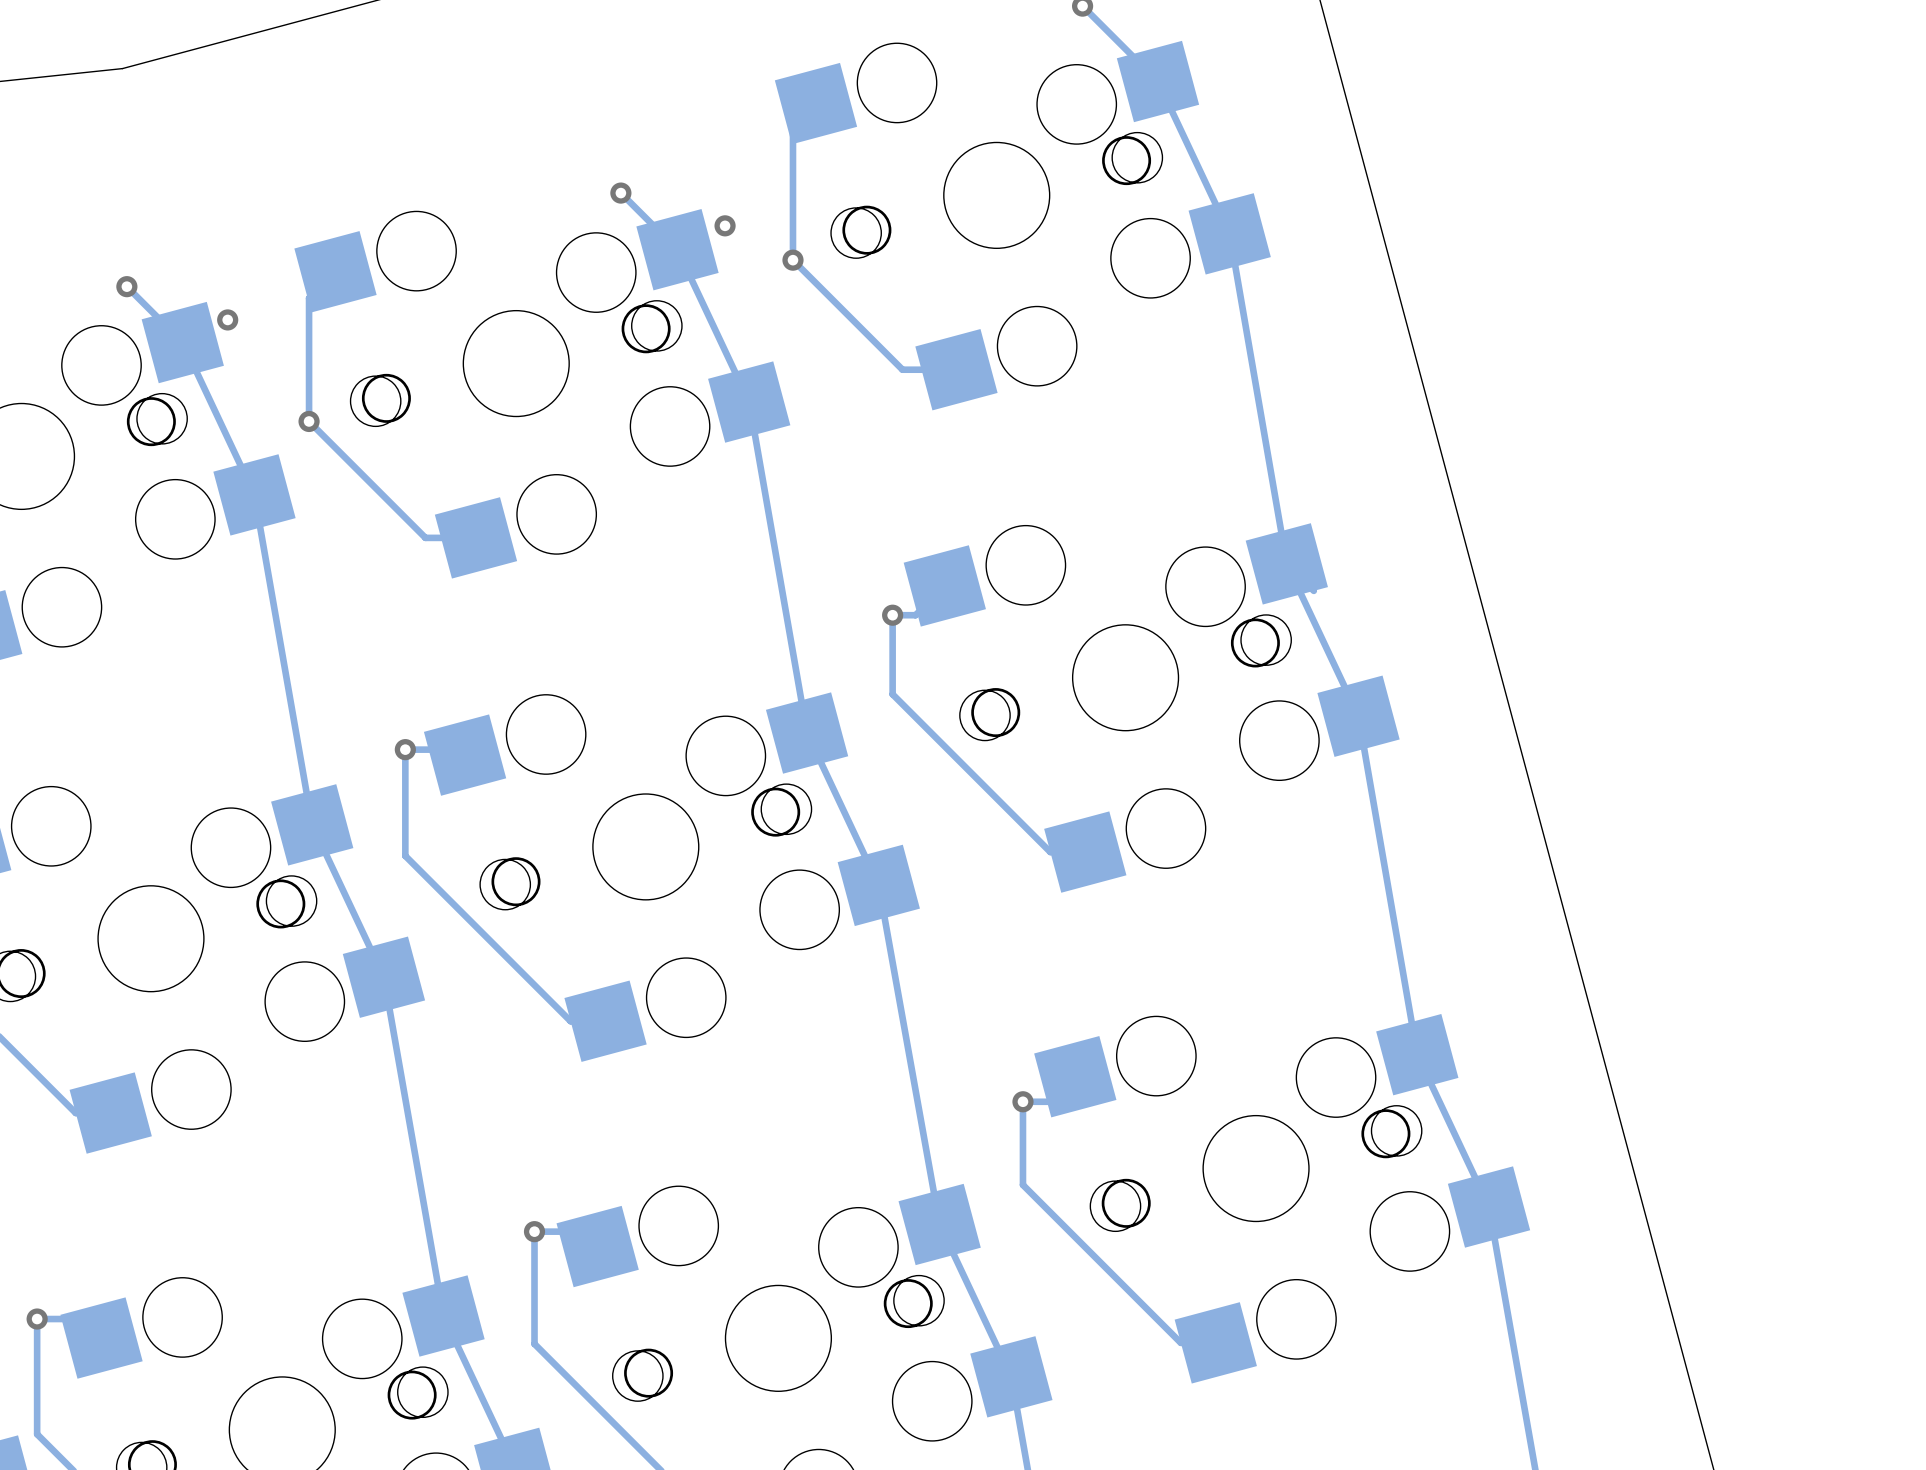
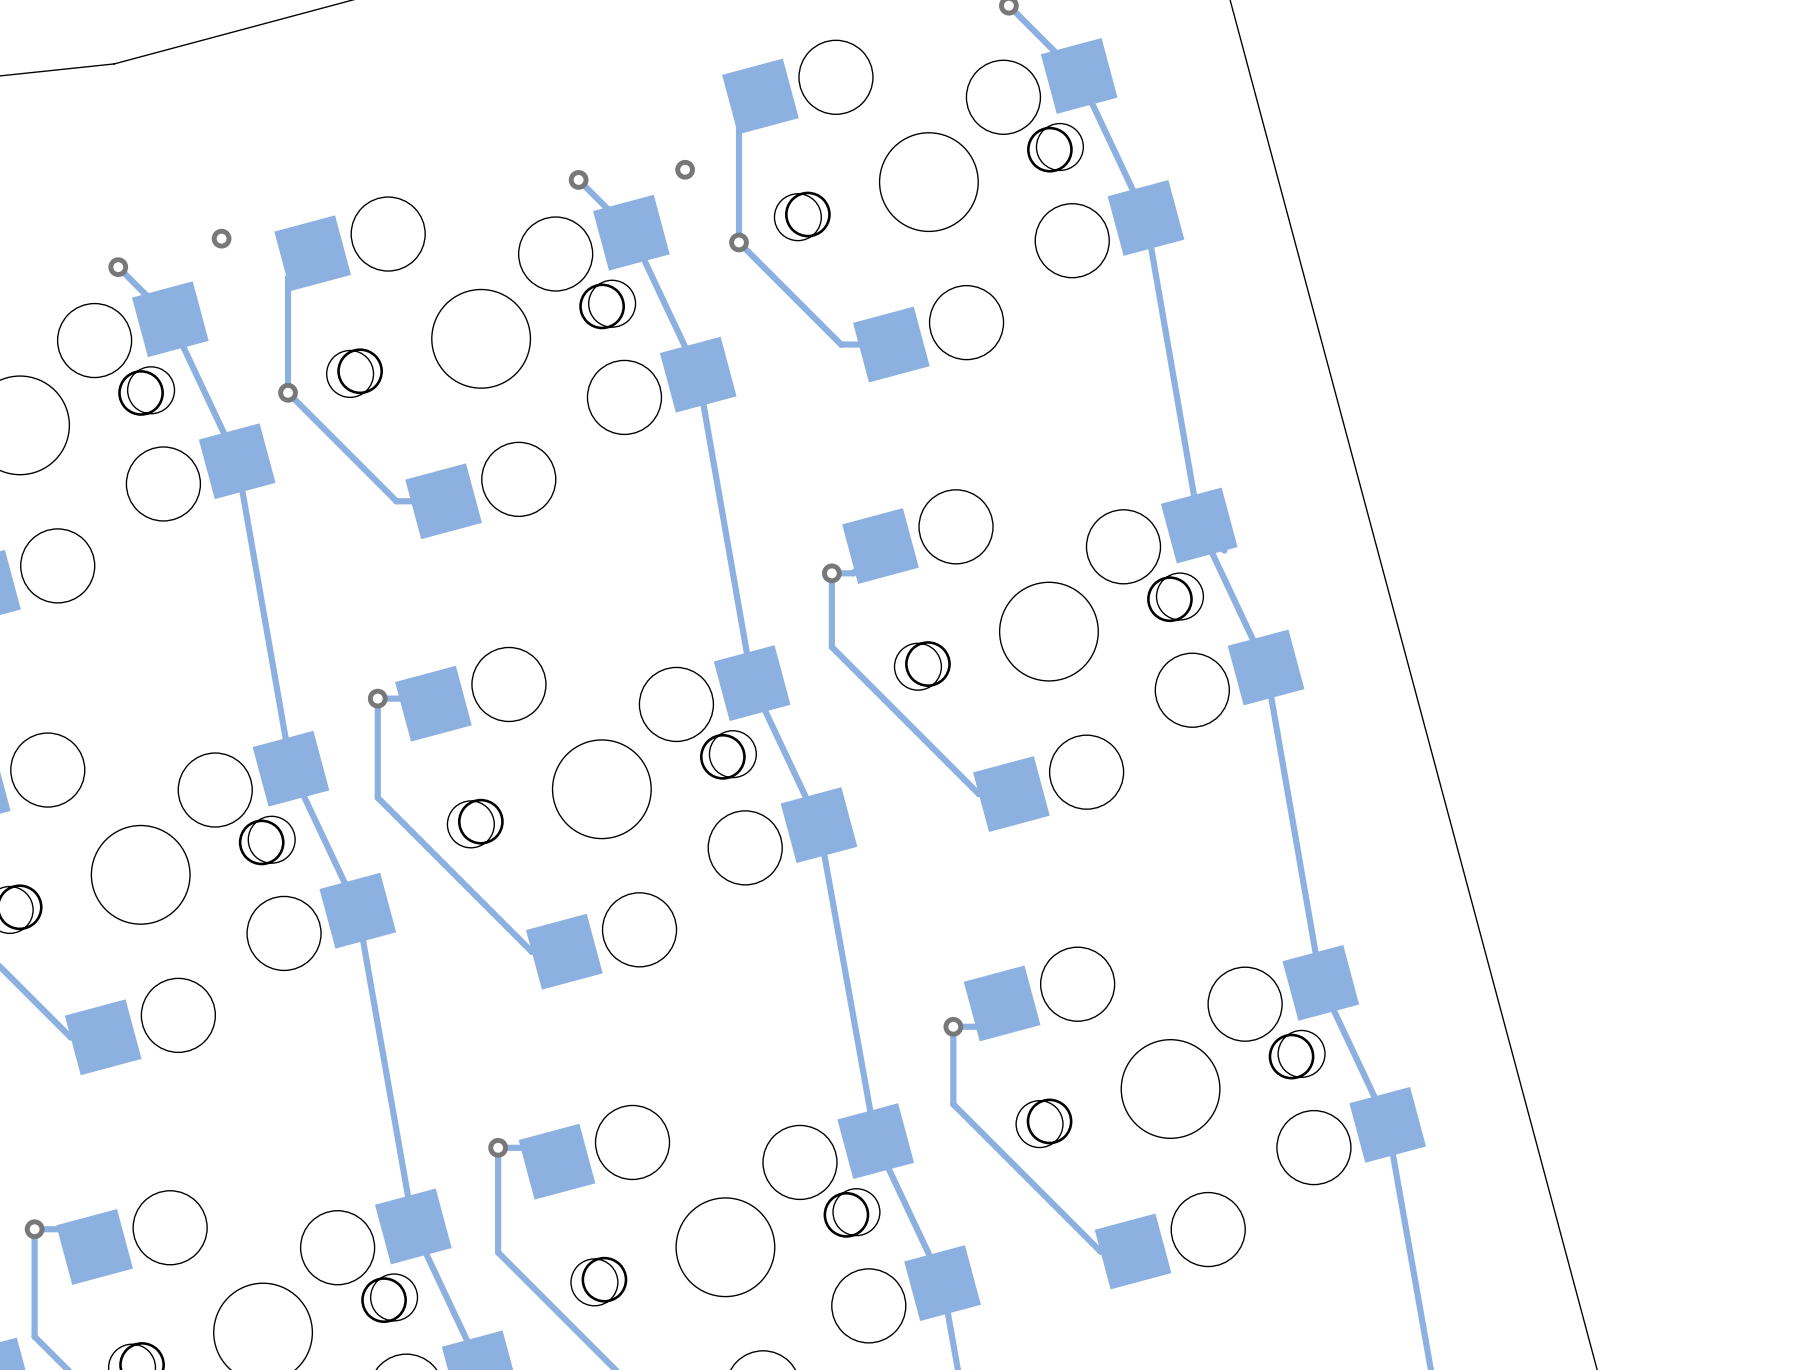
via position: (725, 225) -> (685, 169)
via position: (227, 319) -> (221, 238)

